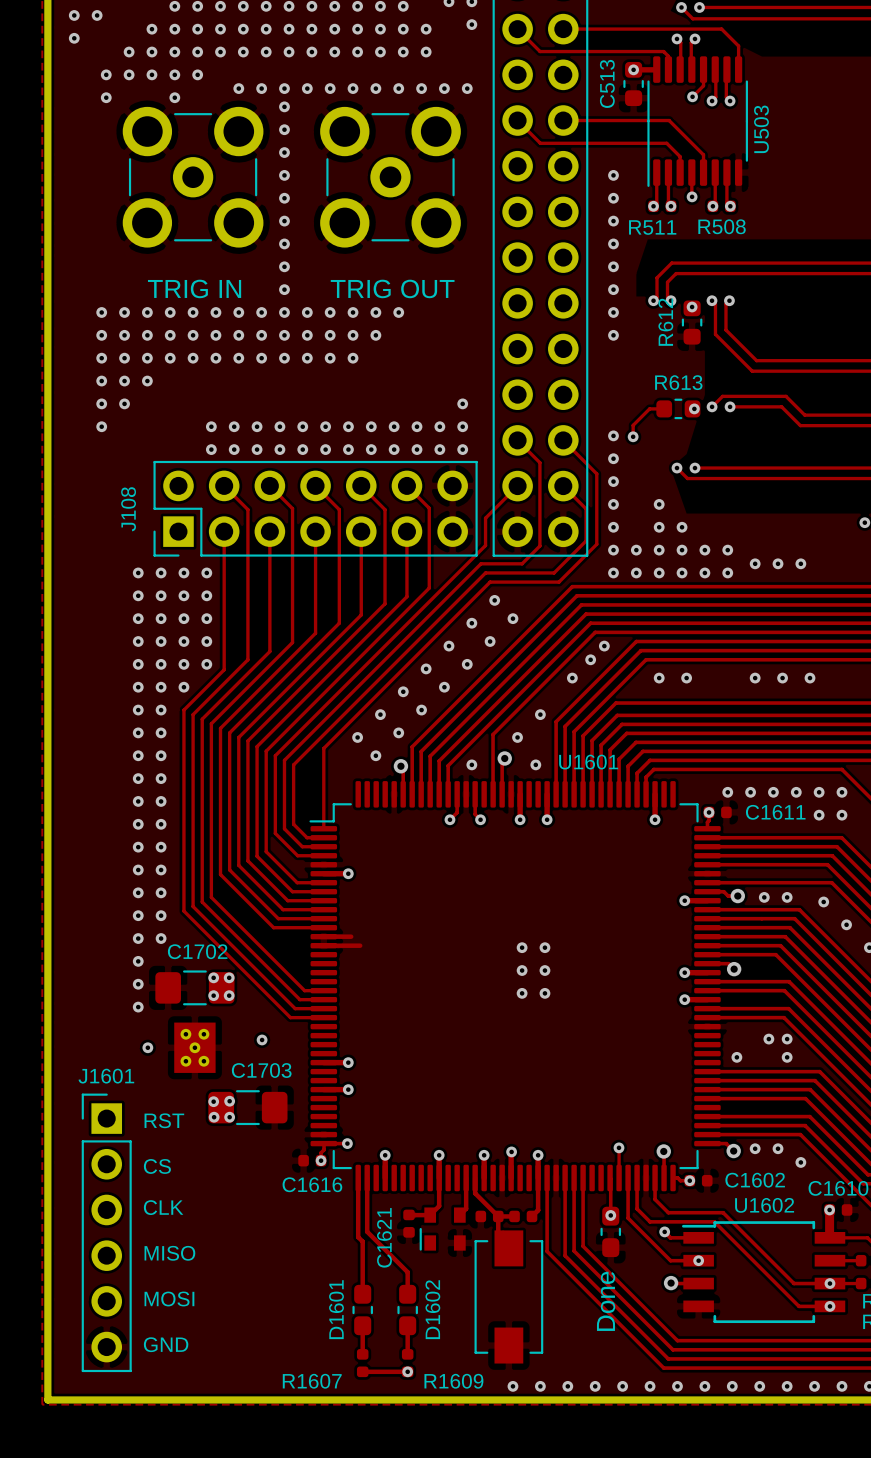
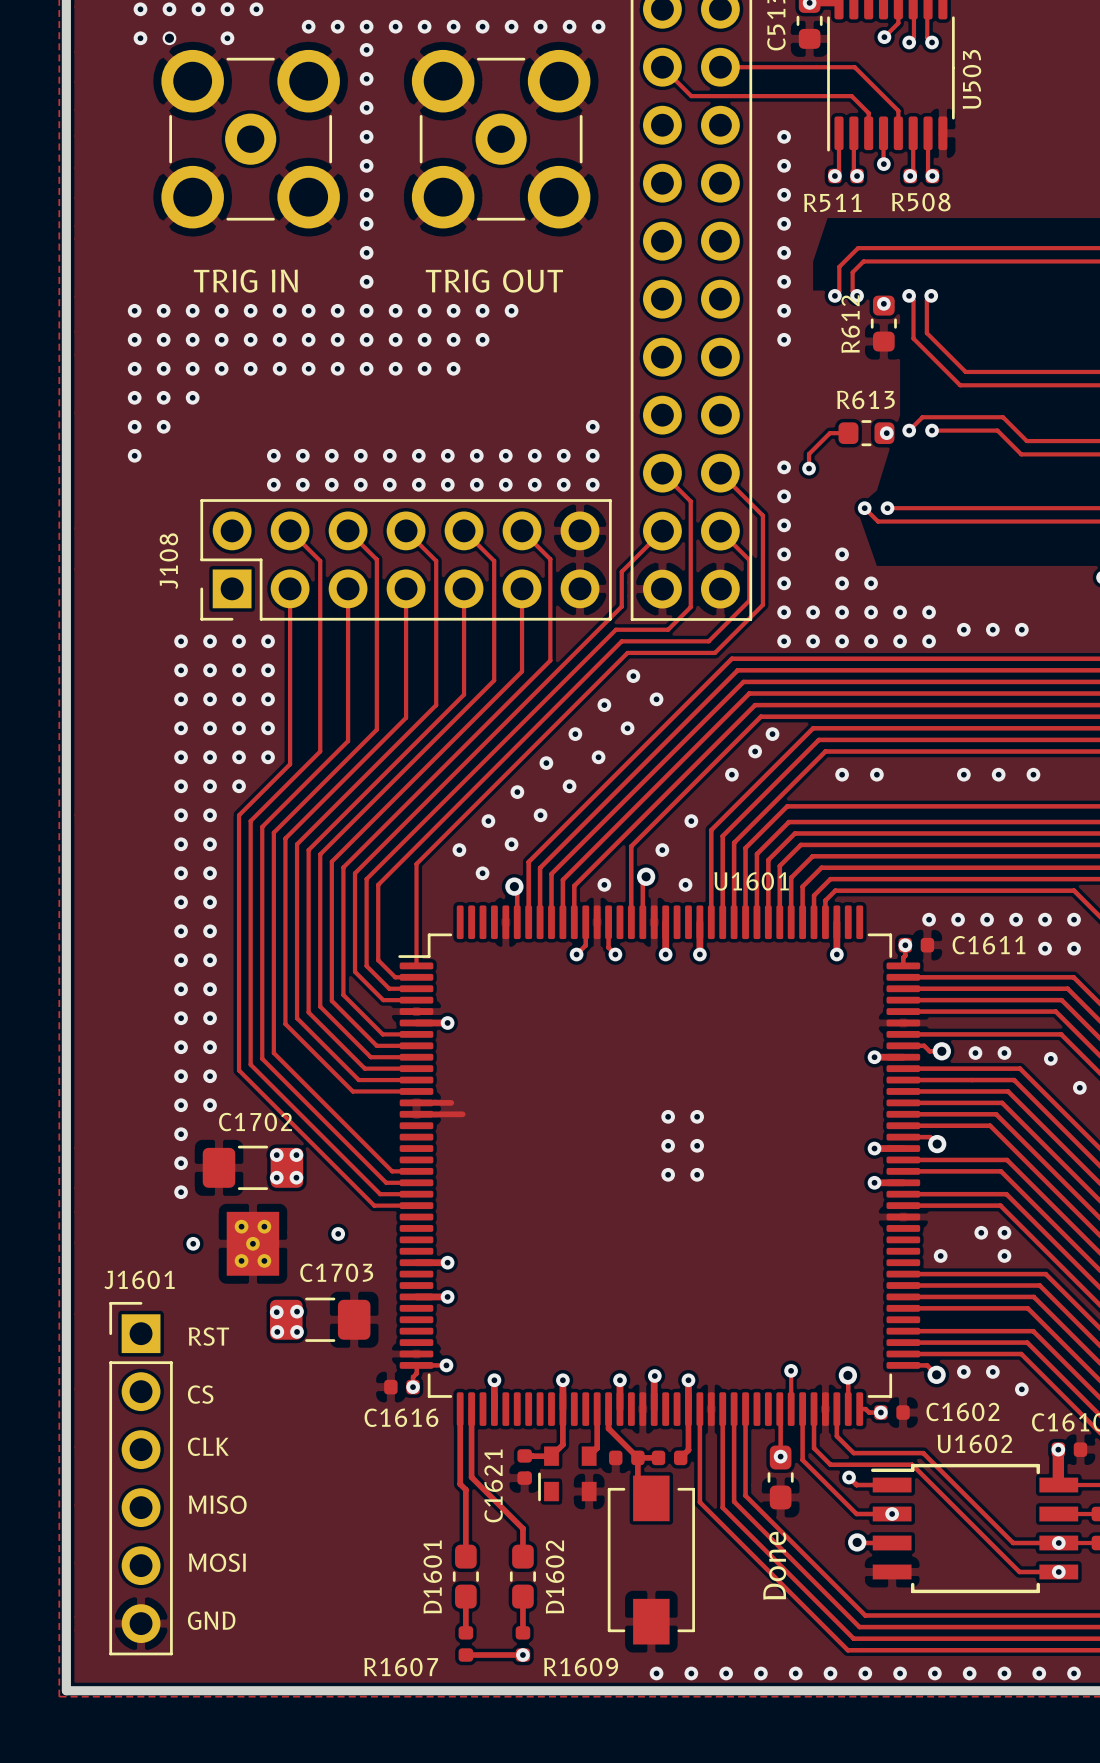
via: none -> (169, 38)

